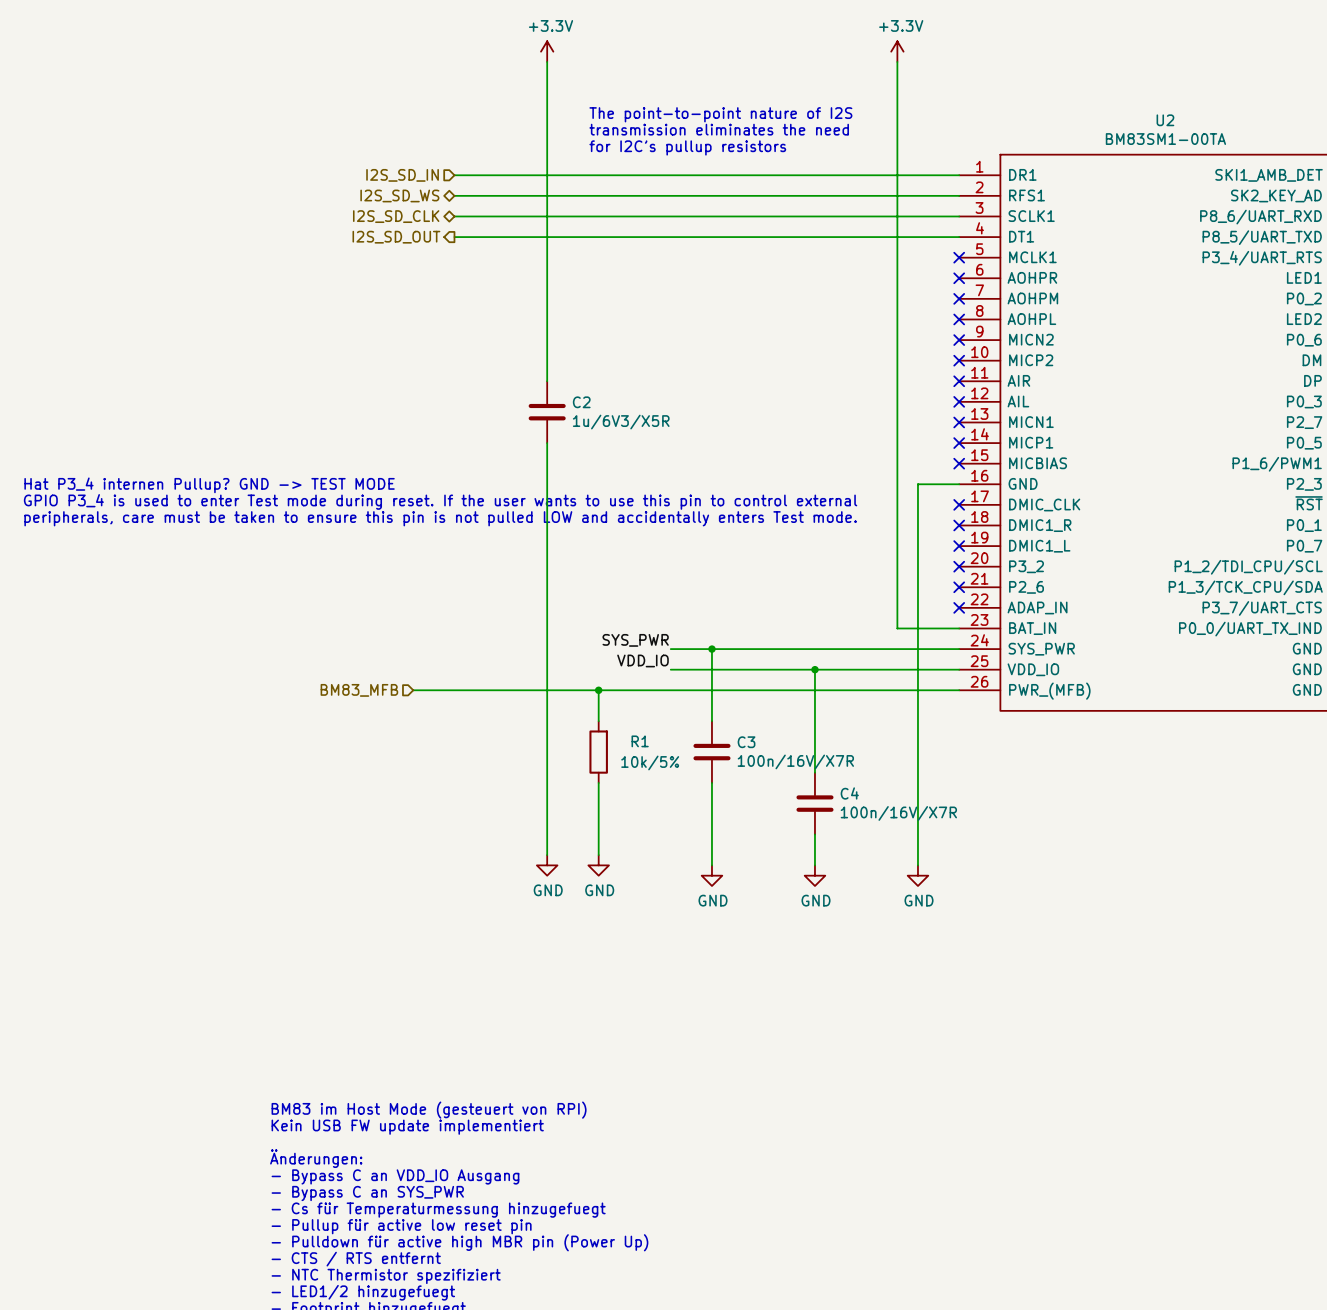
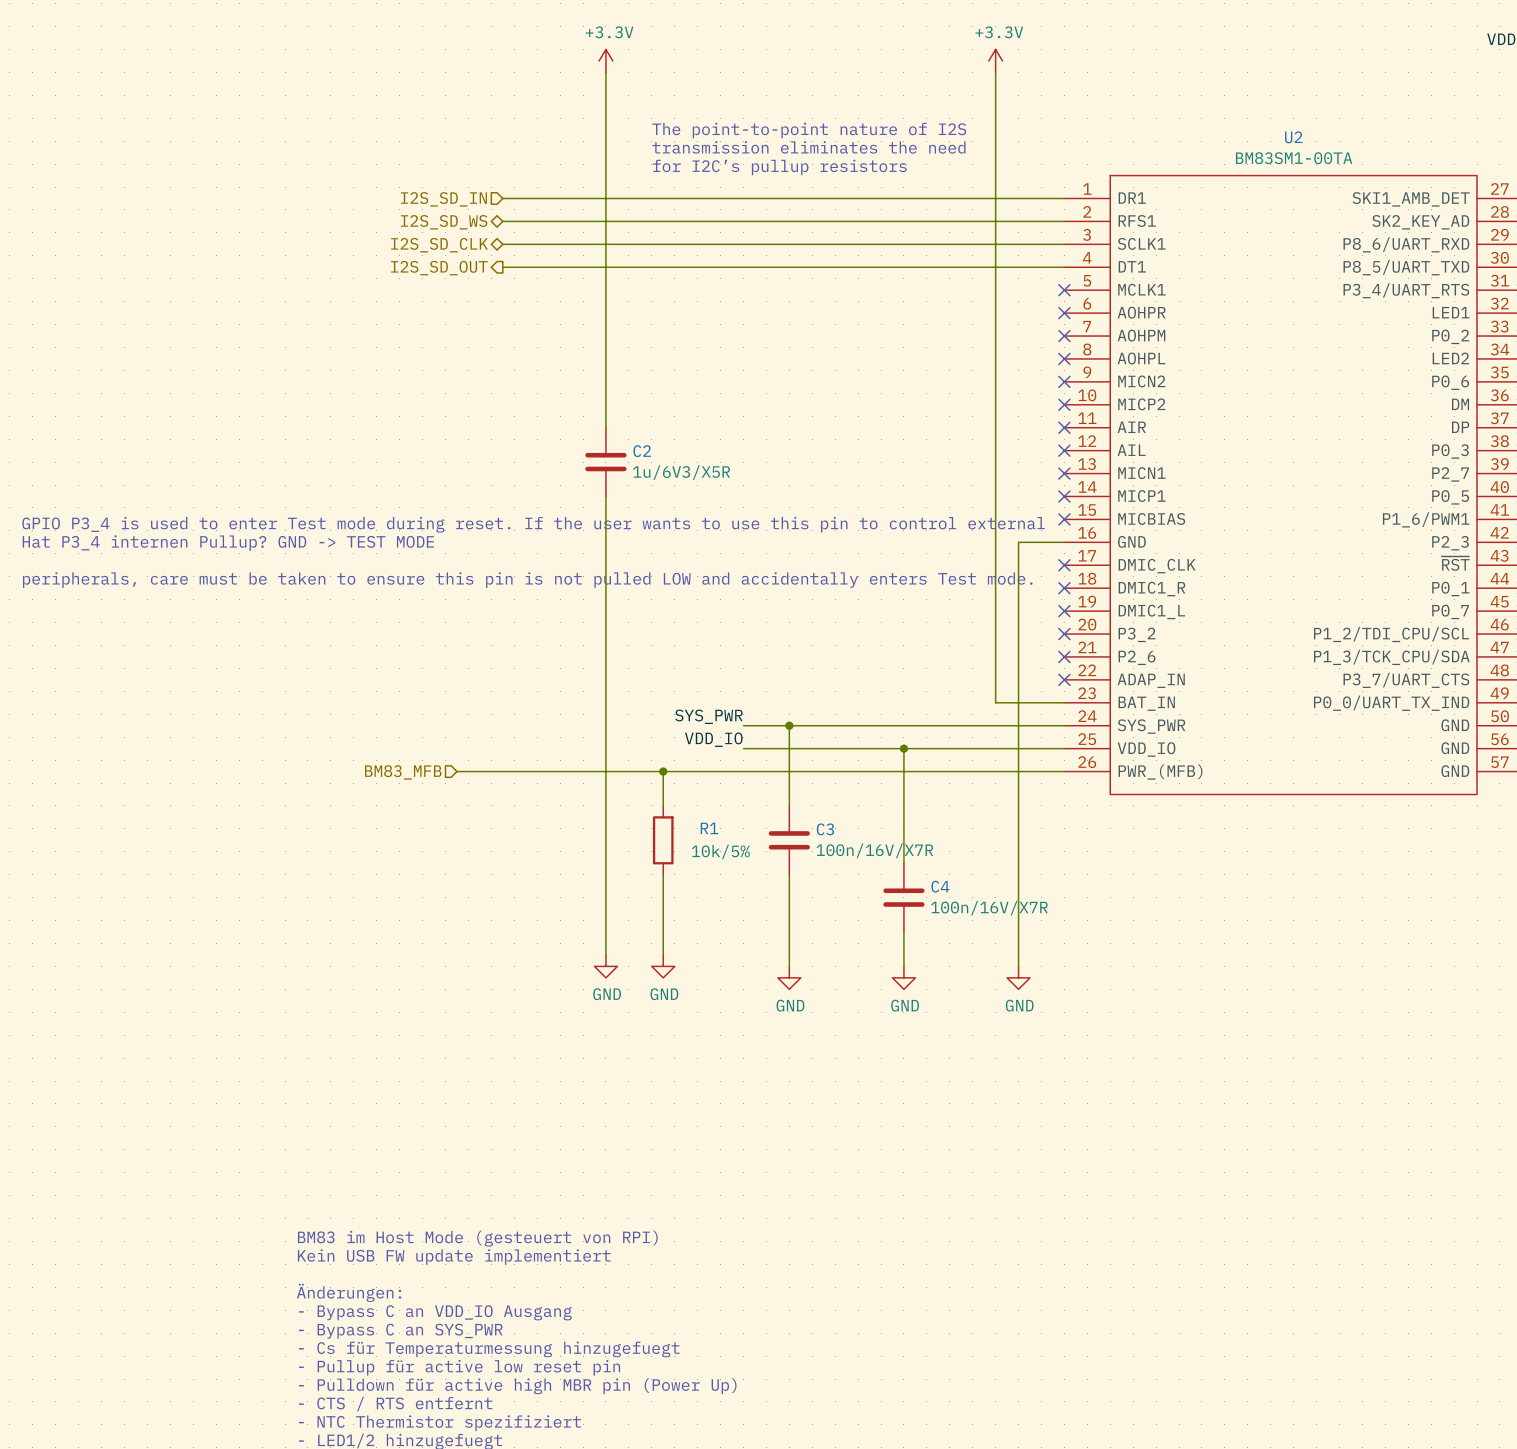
text position: GPIO P3_4 is used to enter Test mode during reset. If the user wants to use this pin to control external (440, 501) -> GPIO P3_4 is used to enter Test mode during reset. If the user wants to use this pin to control external (533, 524)

